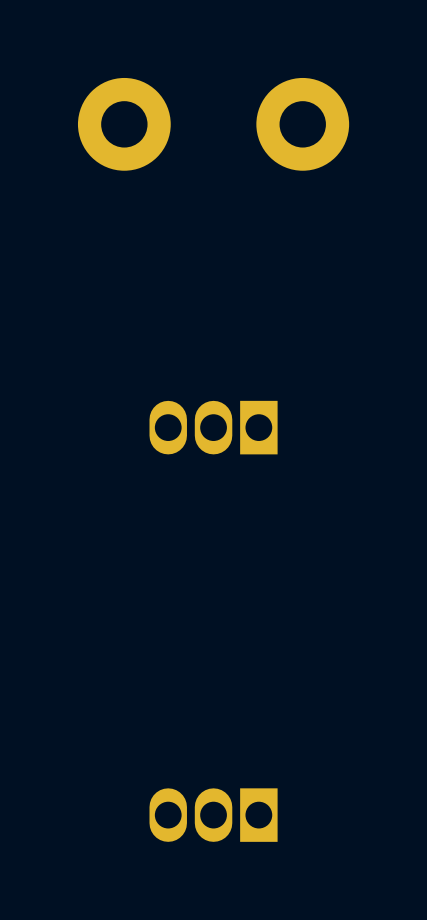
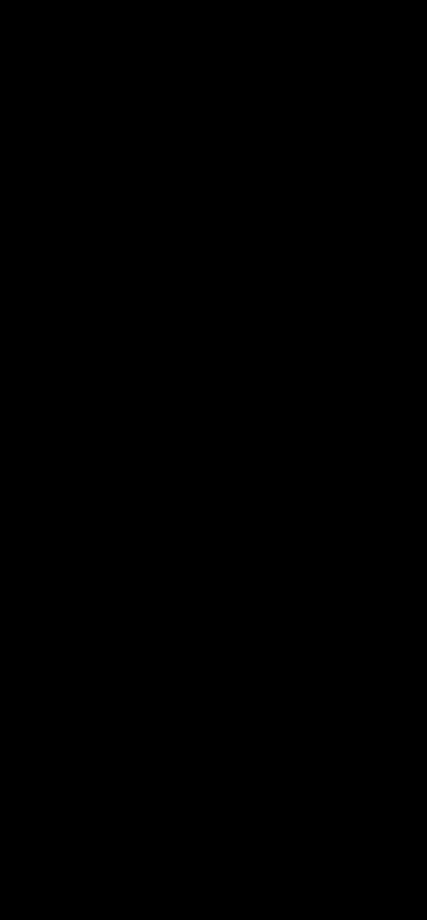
part: (213, 124) -> none
part: (213, 427) -> none
part: (213, 815) -> none

